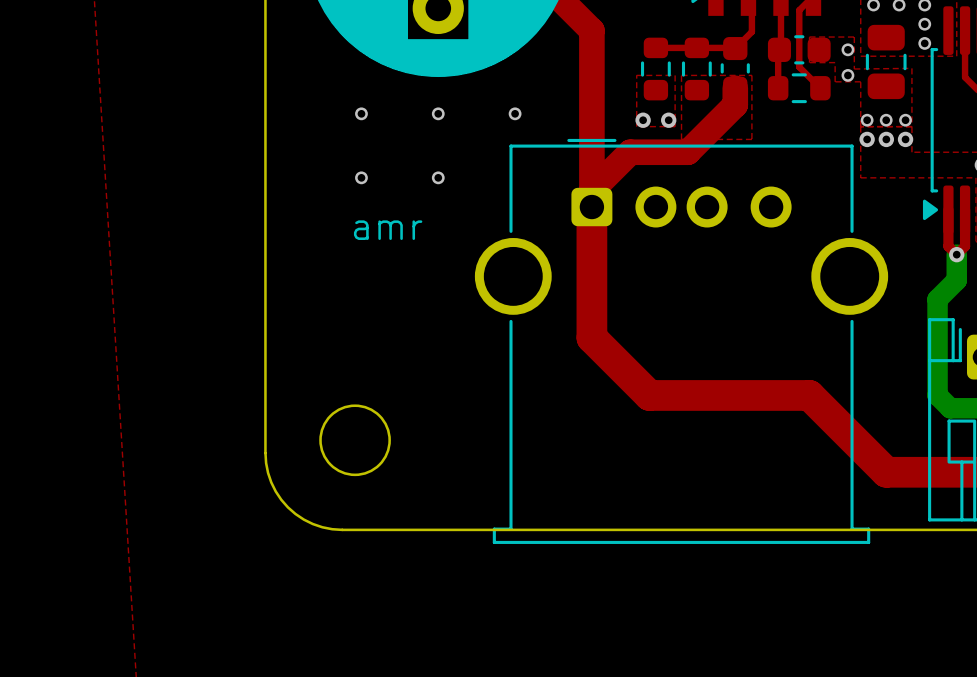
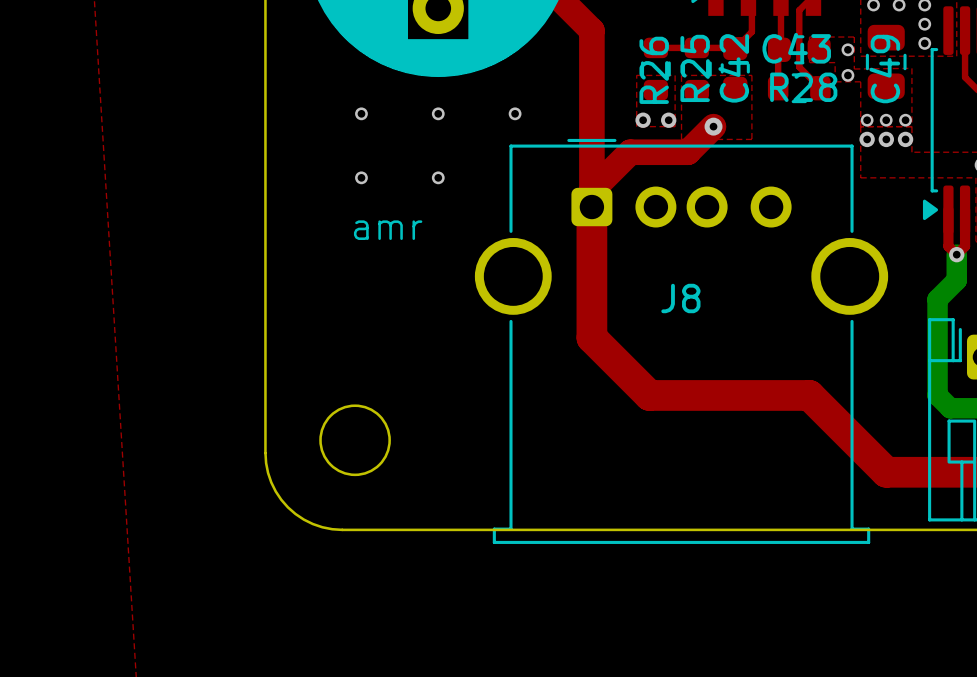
C43 name: none -> C43 (796, 48)
R25 name: none -> R25 (695, 68)
C42 name: none -> C42 (733, 68)
C49 name: none -> C49 (884, 69)
R26 name: none -> R26 (654, 70)
R28 name: none -> R28 (803, 87)
top track: (735, 88) (735, 104) (713, 126) -> none
via: none -> (713, 126)
J8 name: none -> J8 (680, 298)

